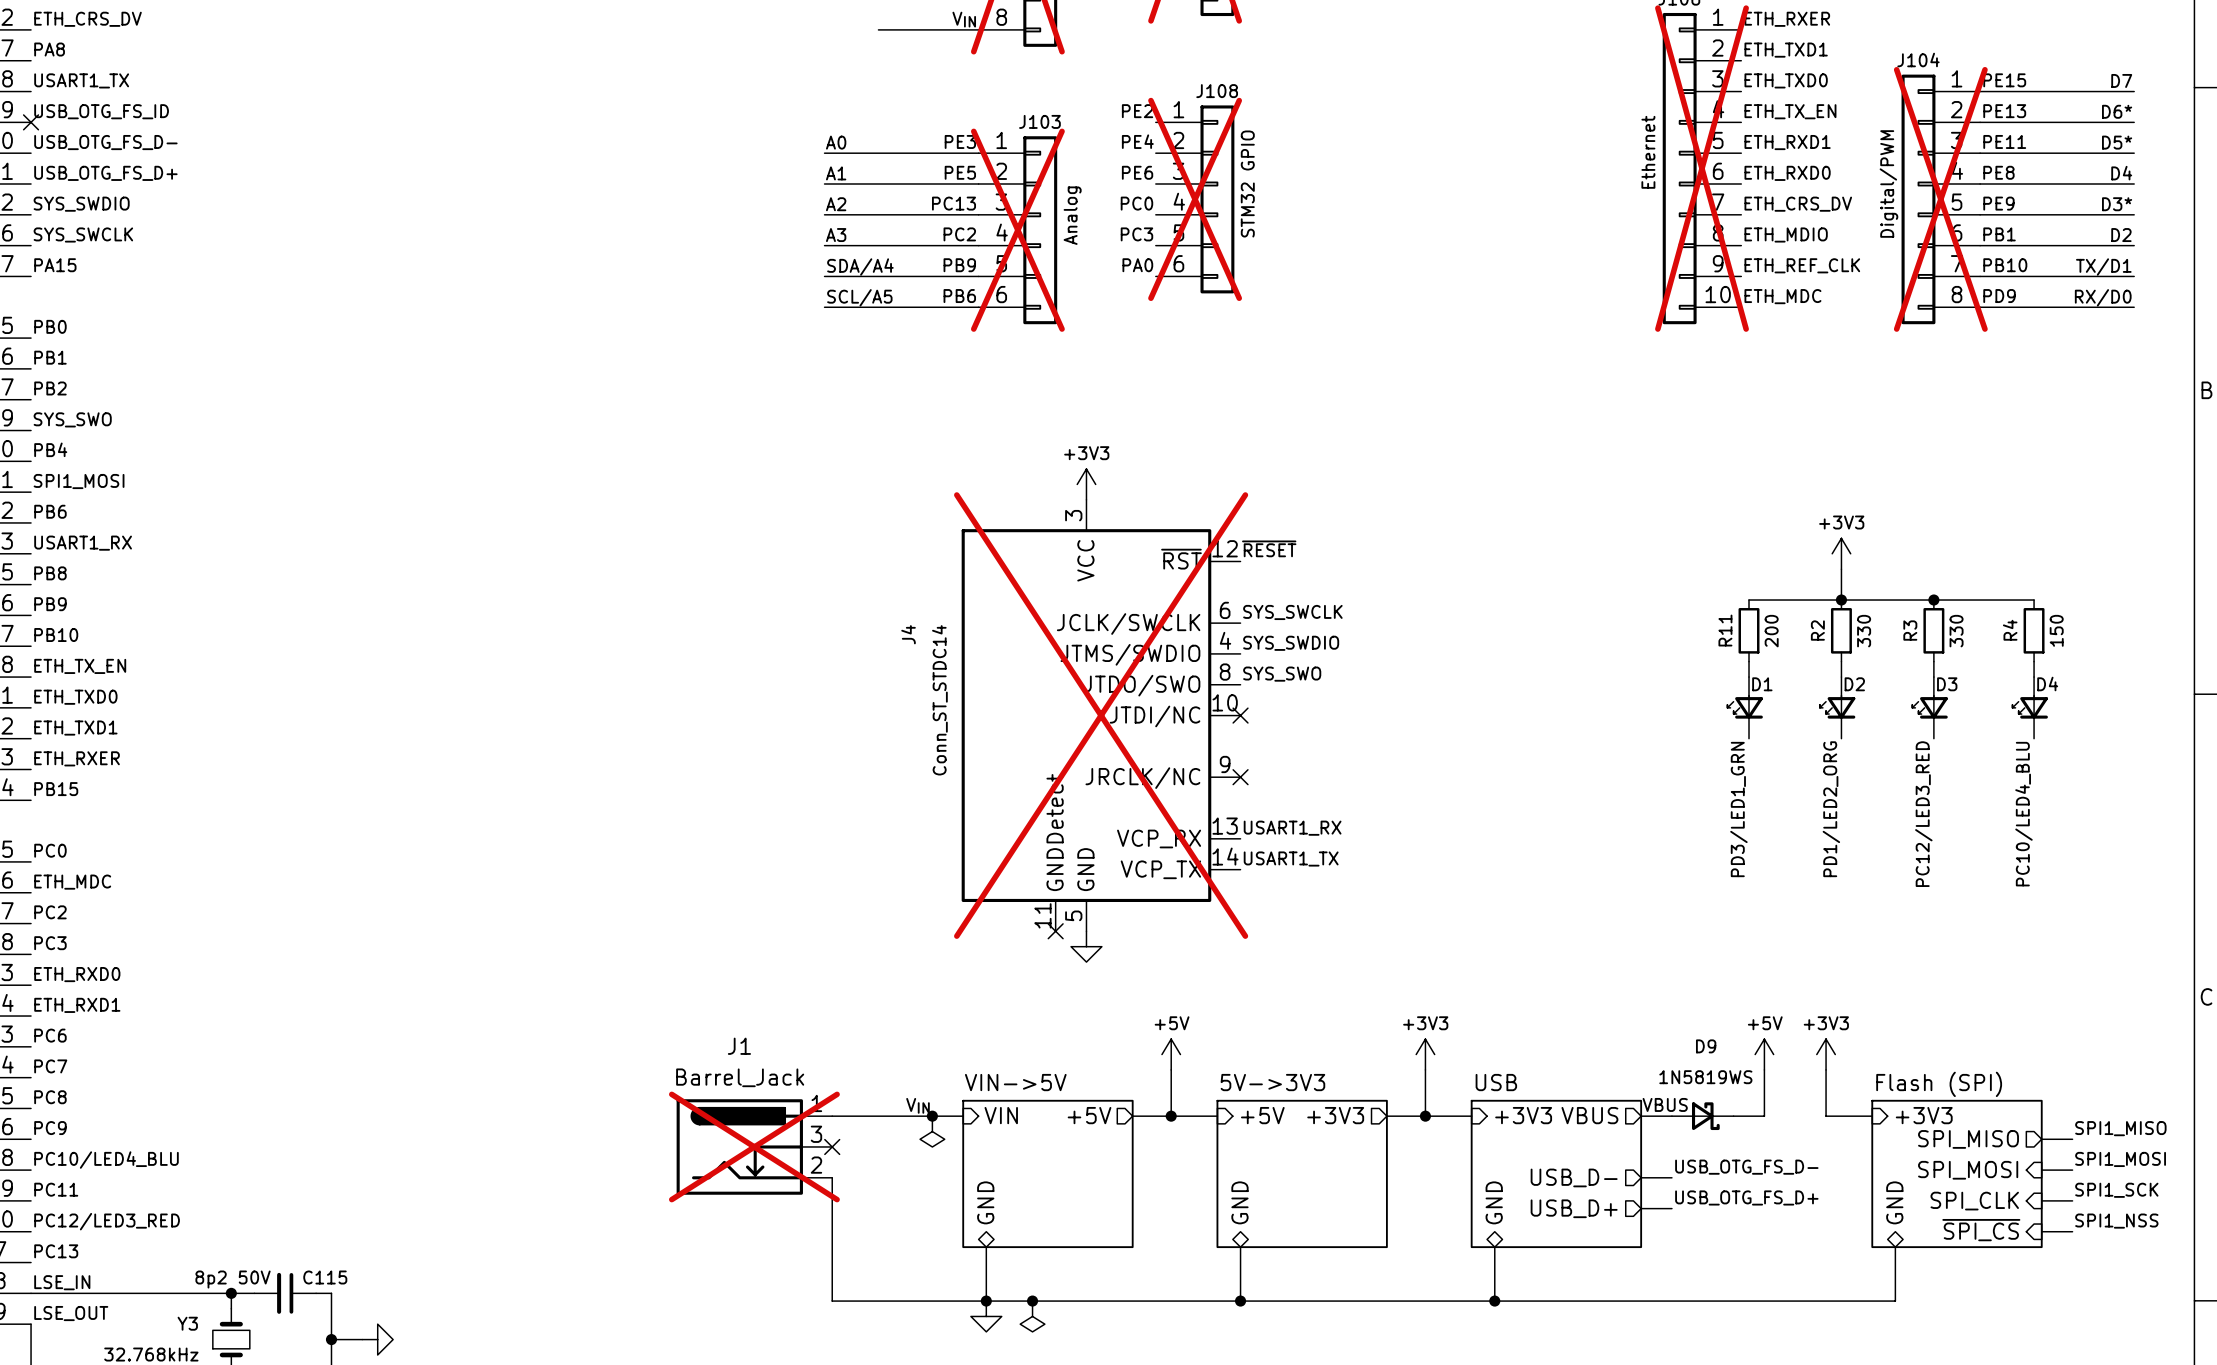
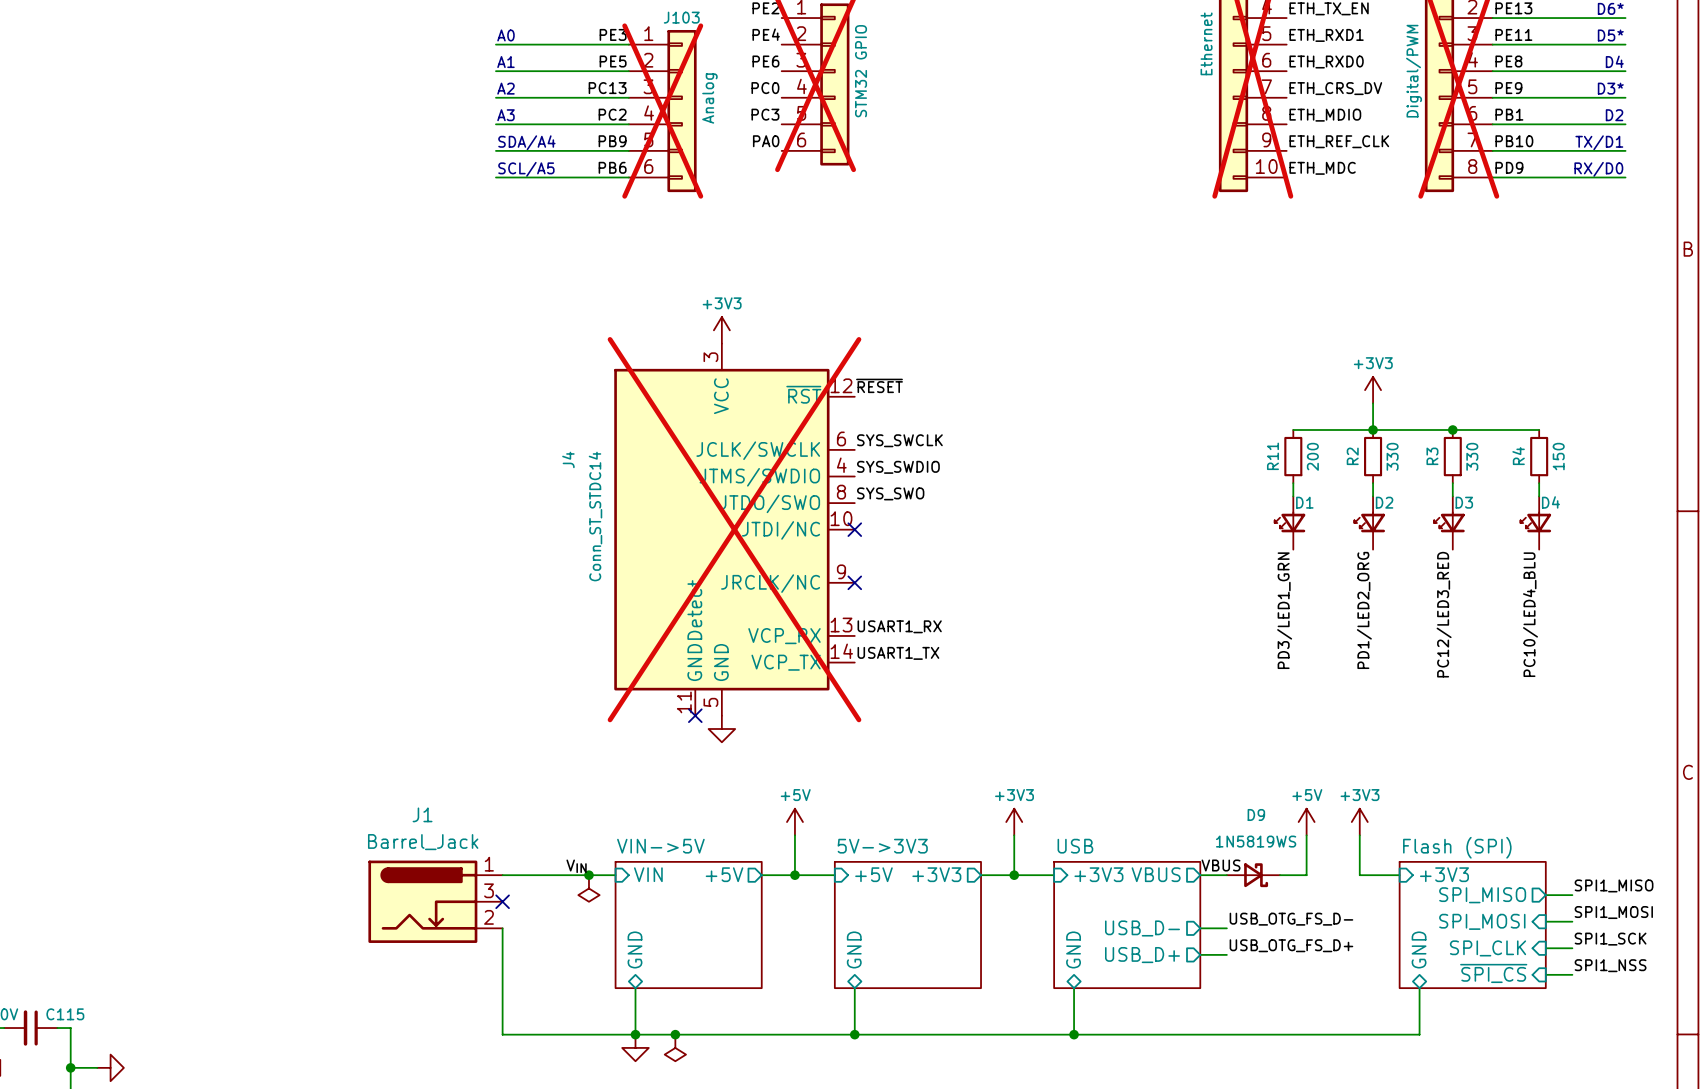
J1 do-not-place cross: (754, 1146) -> none

